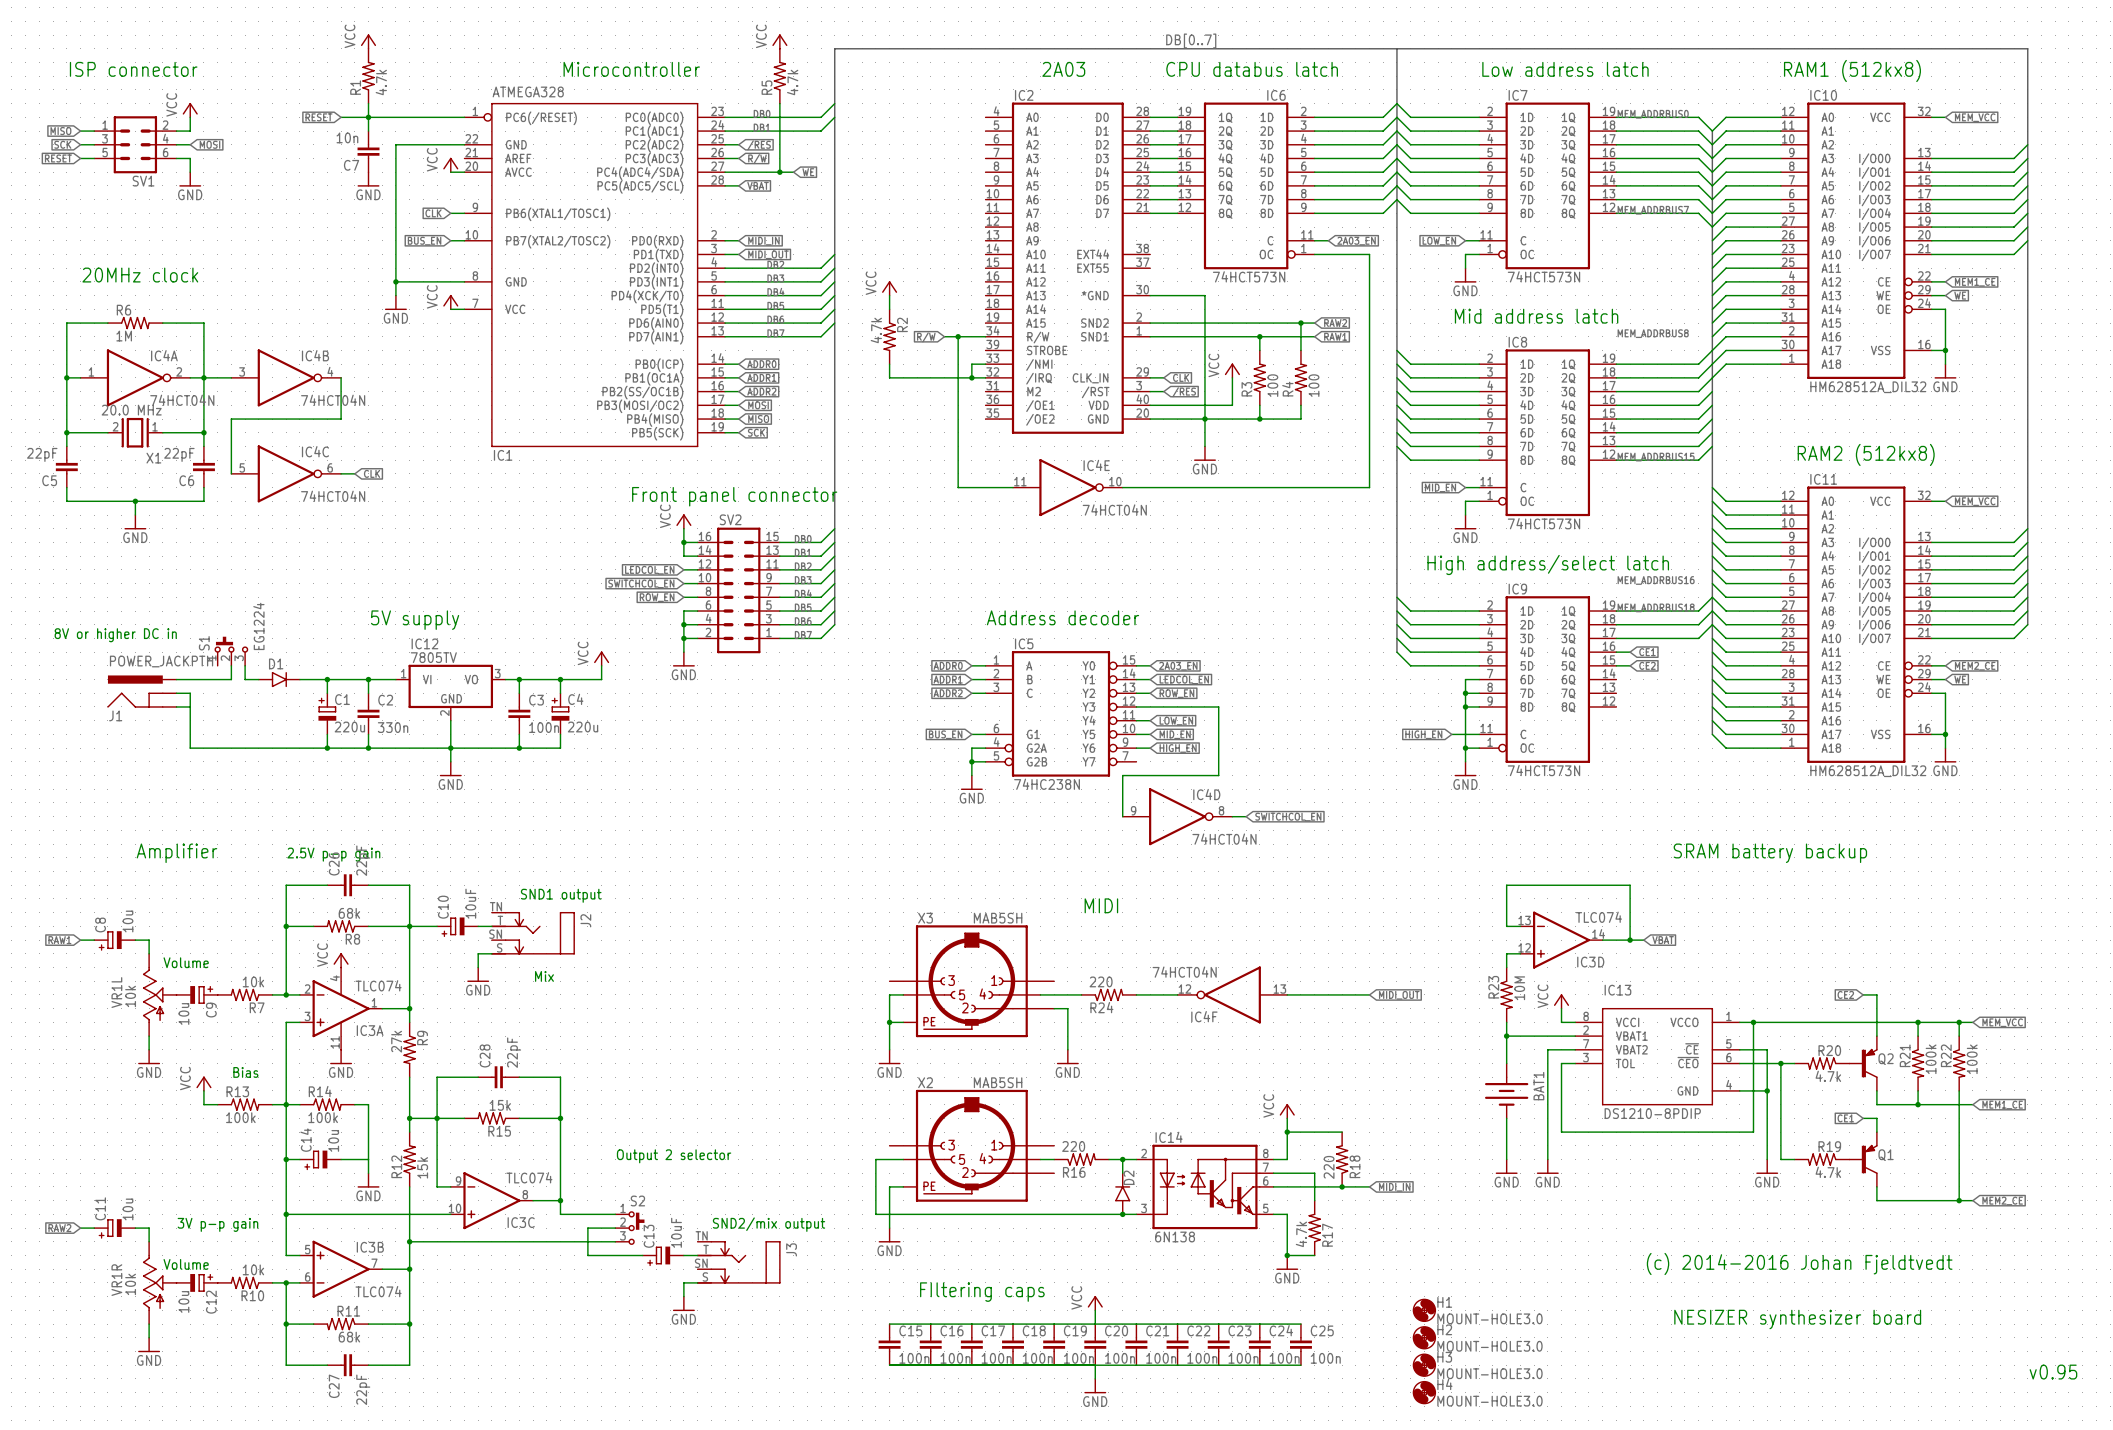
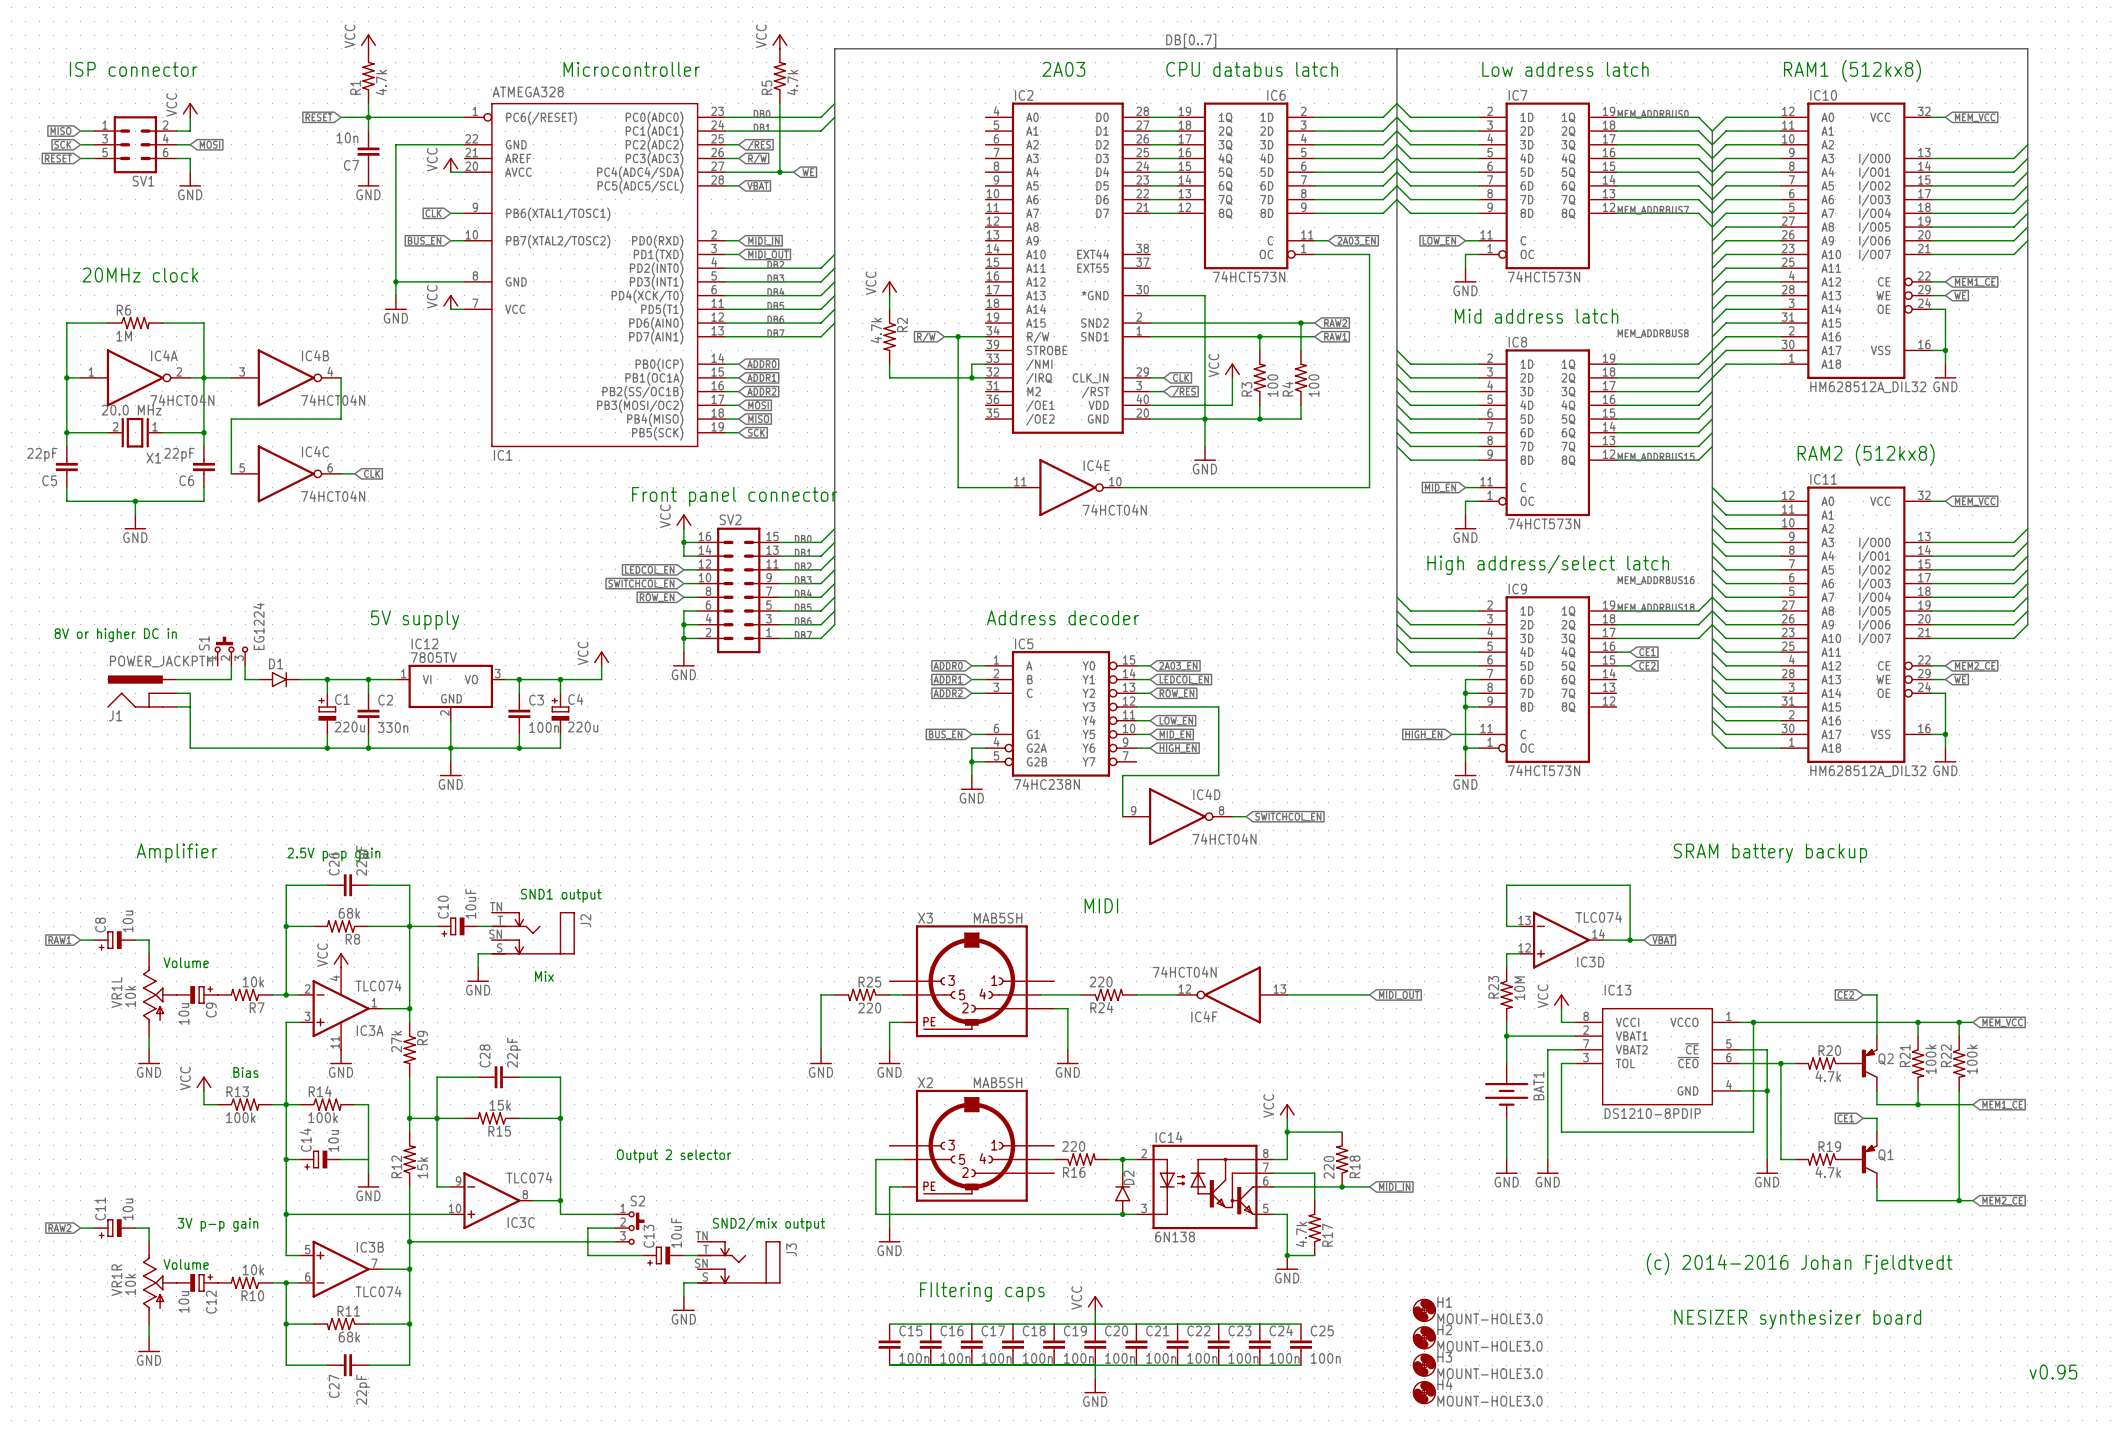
wire: none -> (834, 994) (821, 994) (821, 1049)
R25: none -> 220 (862, 994)
wire: (889, 994) (889, 1022) -> none
junction: (889, 1022) -> none
power symbol: none -> GND (821, 1057)

